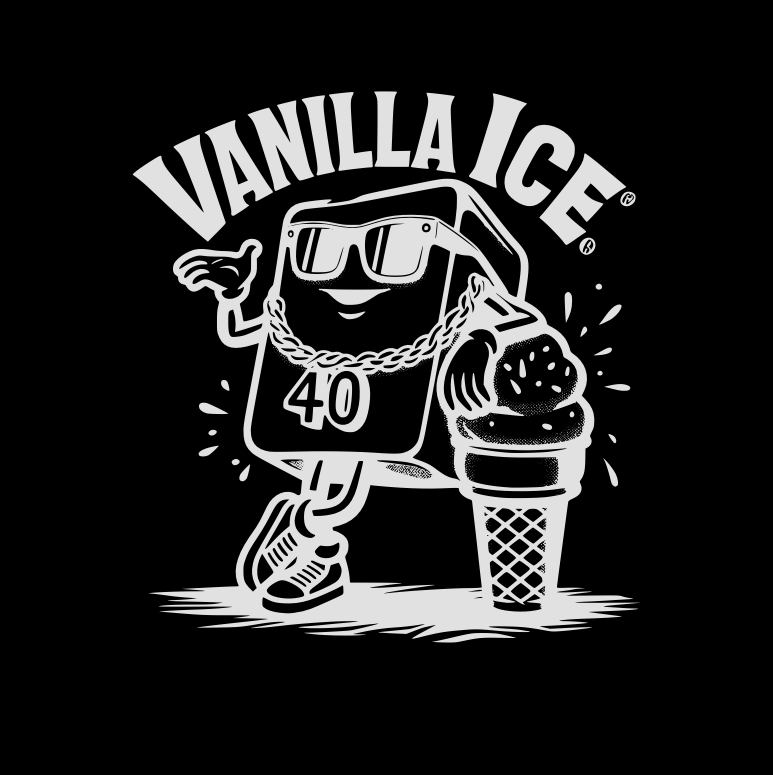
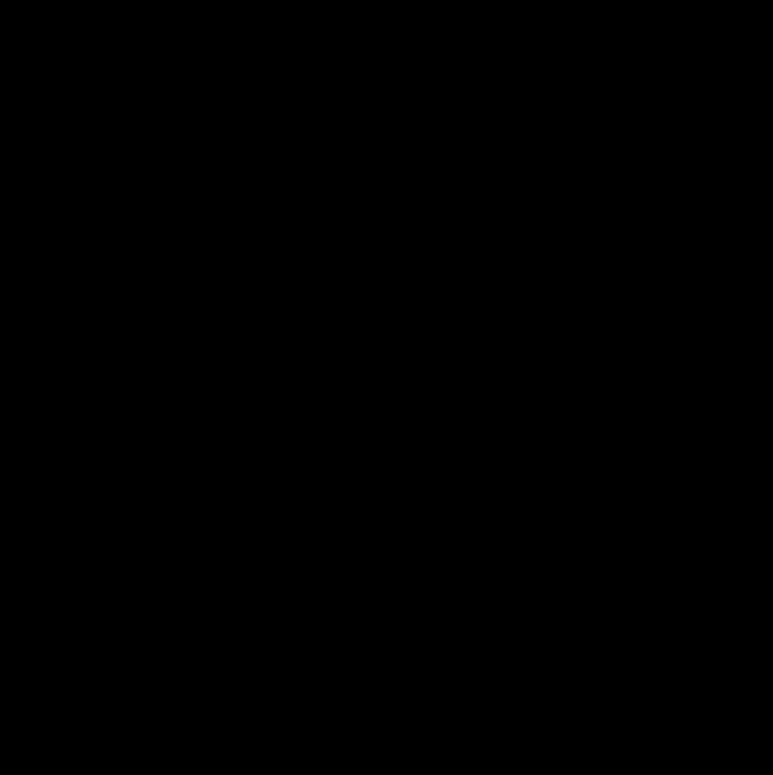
drawing: [132, 91, 641, 643] -> none

